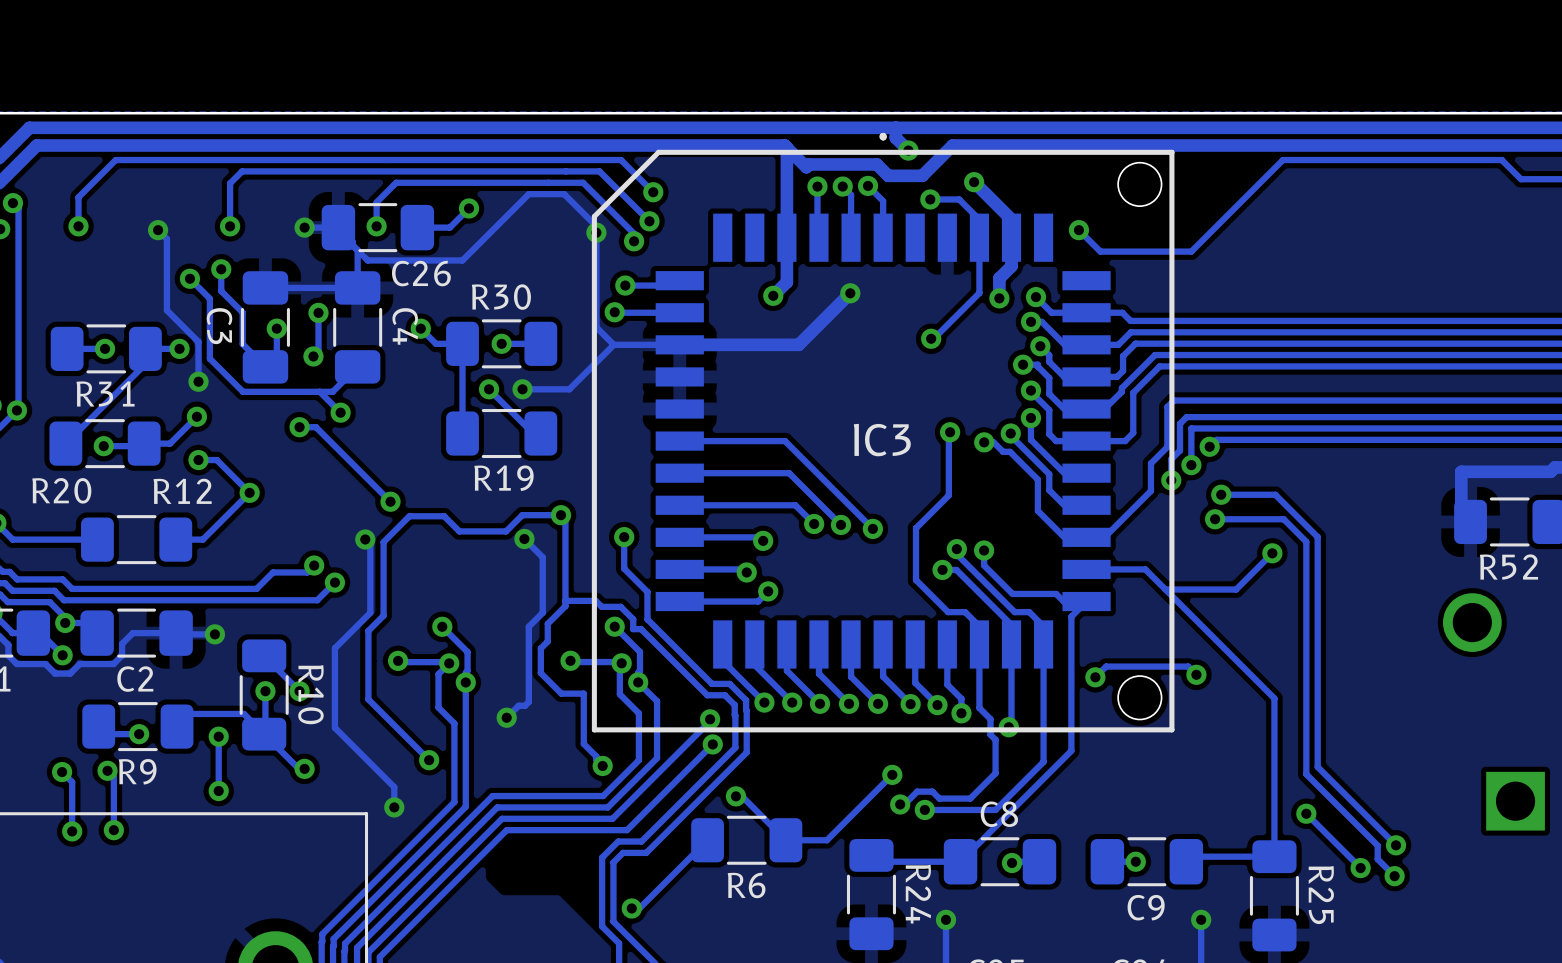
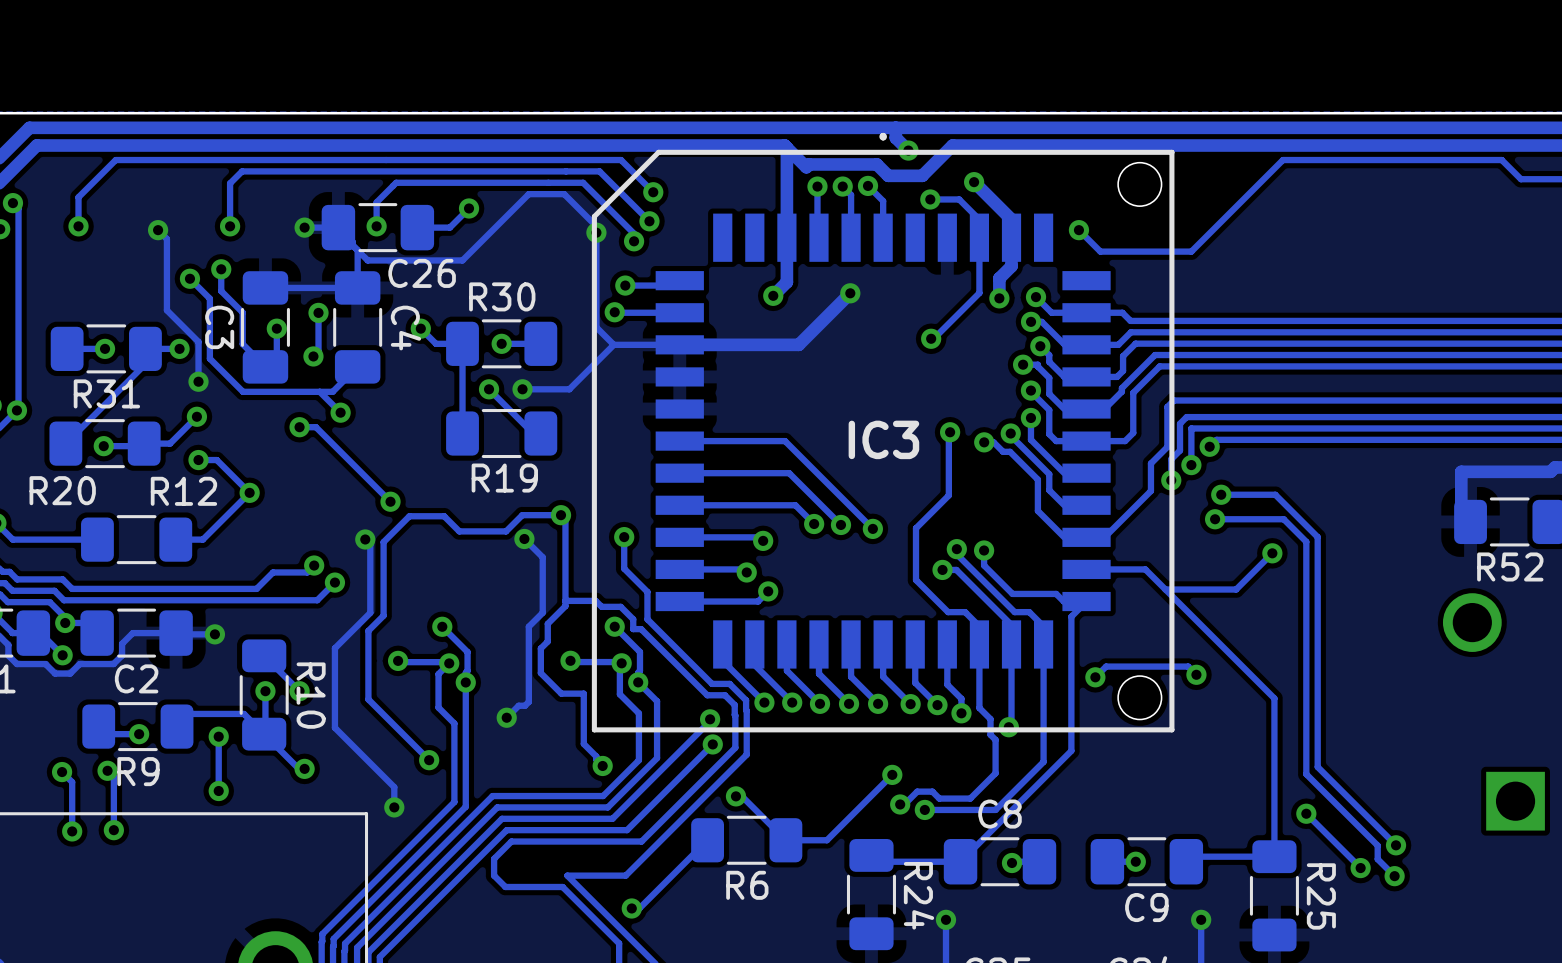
track: (746, 752) (646, 852) (622, 852) (613, 862) (613, 921) -> (746, 752) (746, 754) (625, 875) (567, 875) (613, 921)
track: (618, 841) (602, 857) (602, 926) -> (618, 841) (511, 841) (494, 858) (494, 875) (505, 887) (562, 887) (602, 926)

